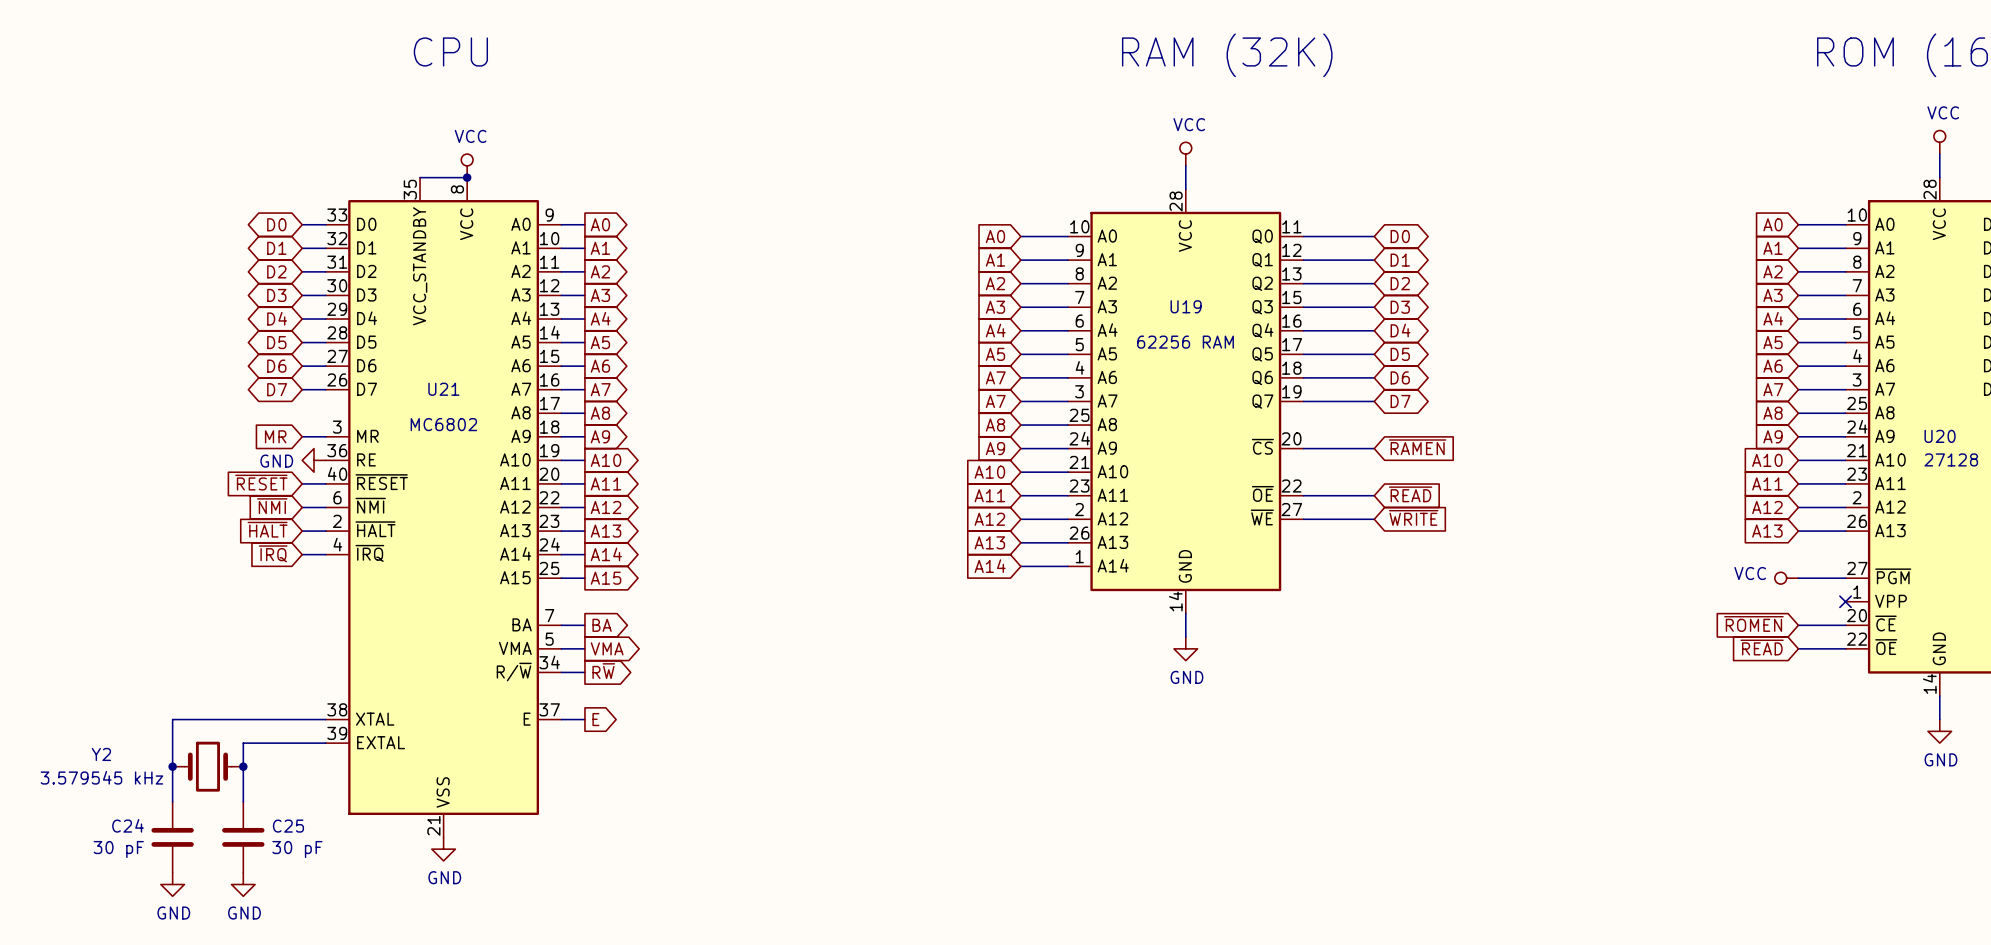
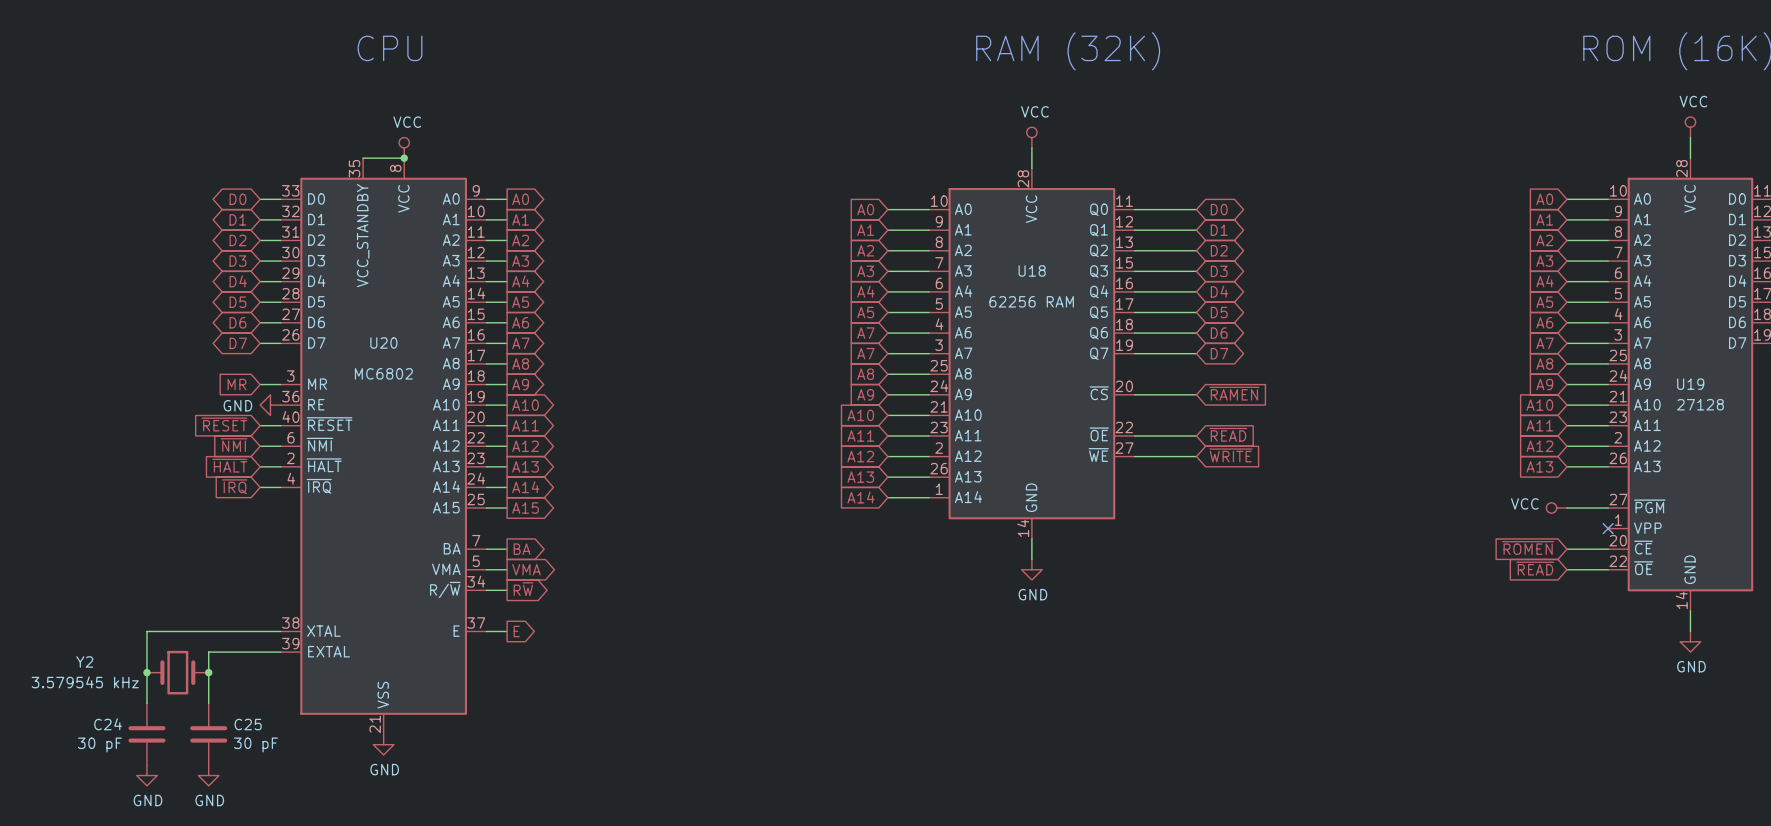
U19 name: U19 (1186, 306) -> U18 (1032, 270)
U21 name: U21 (443, 389) -> U20 (383, 342)
U20 name: U20 (1940, 436) -> U19 (1690, 384)

